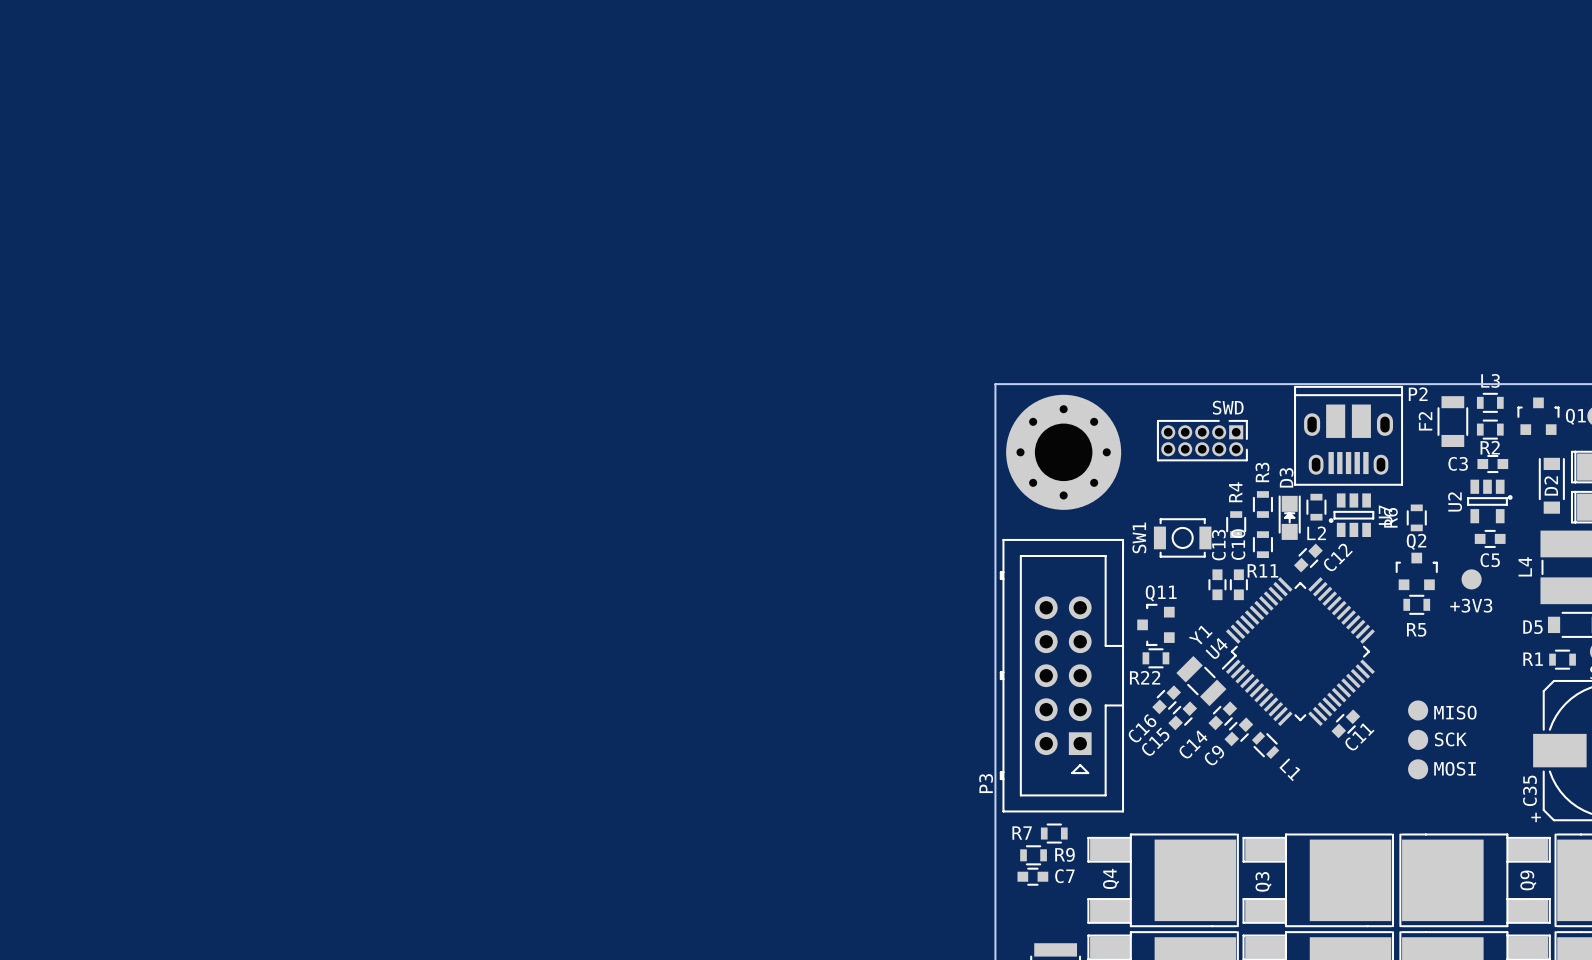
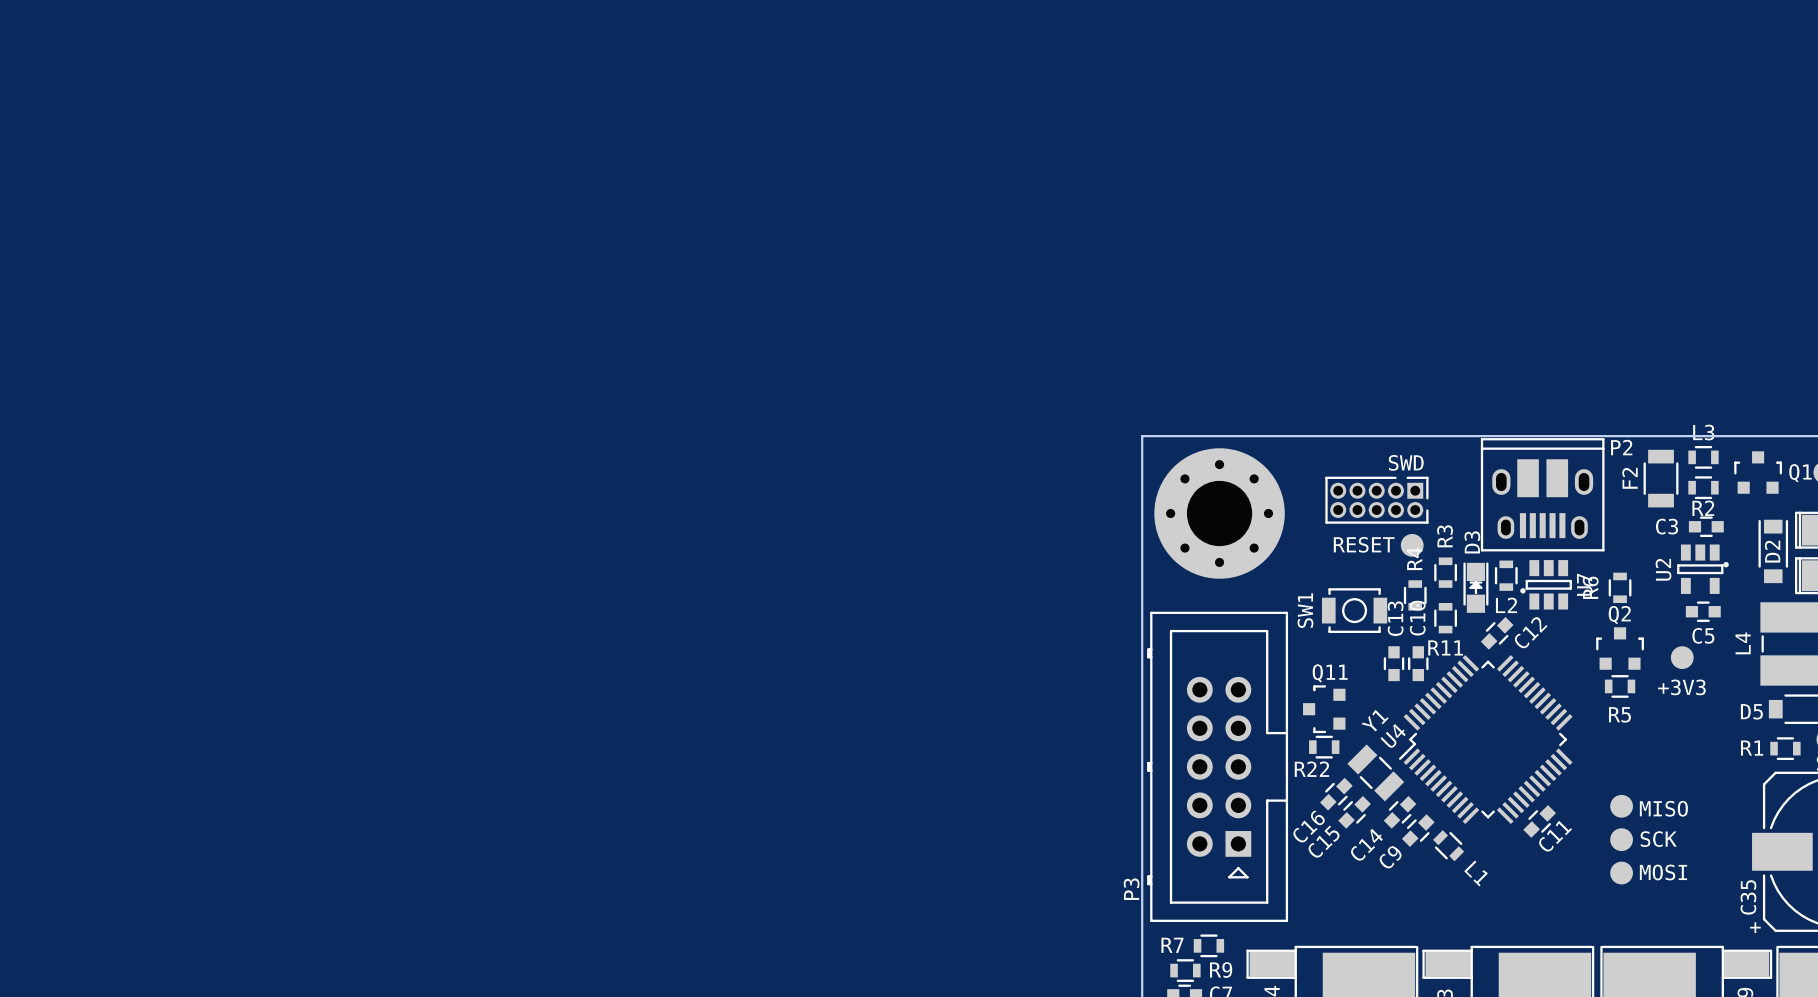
part: none -> RESET (1412, 545)

